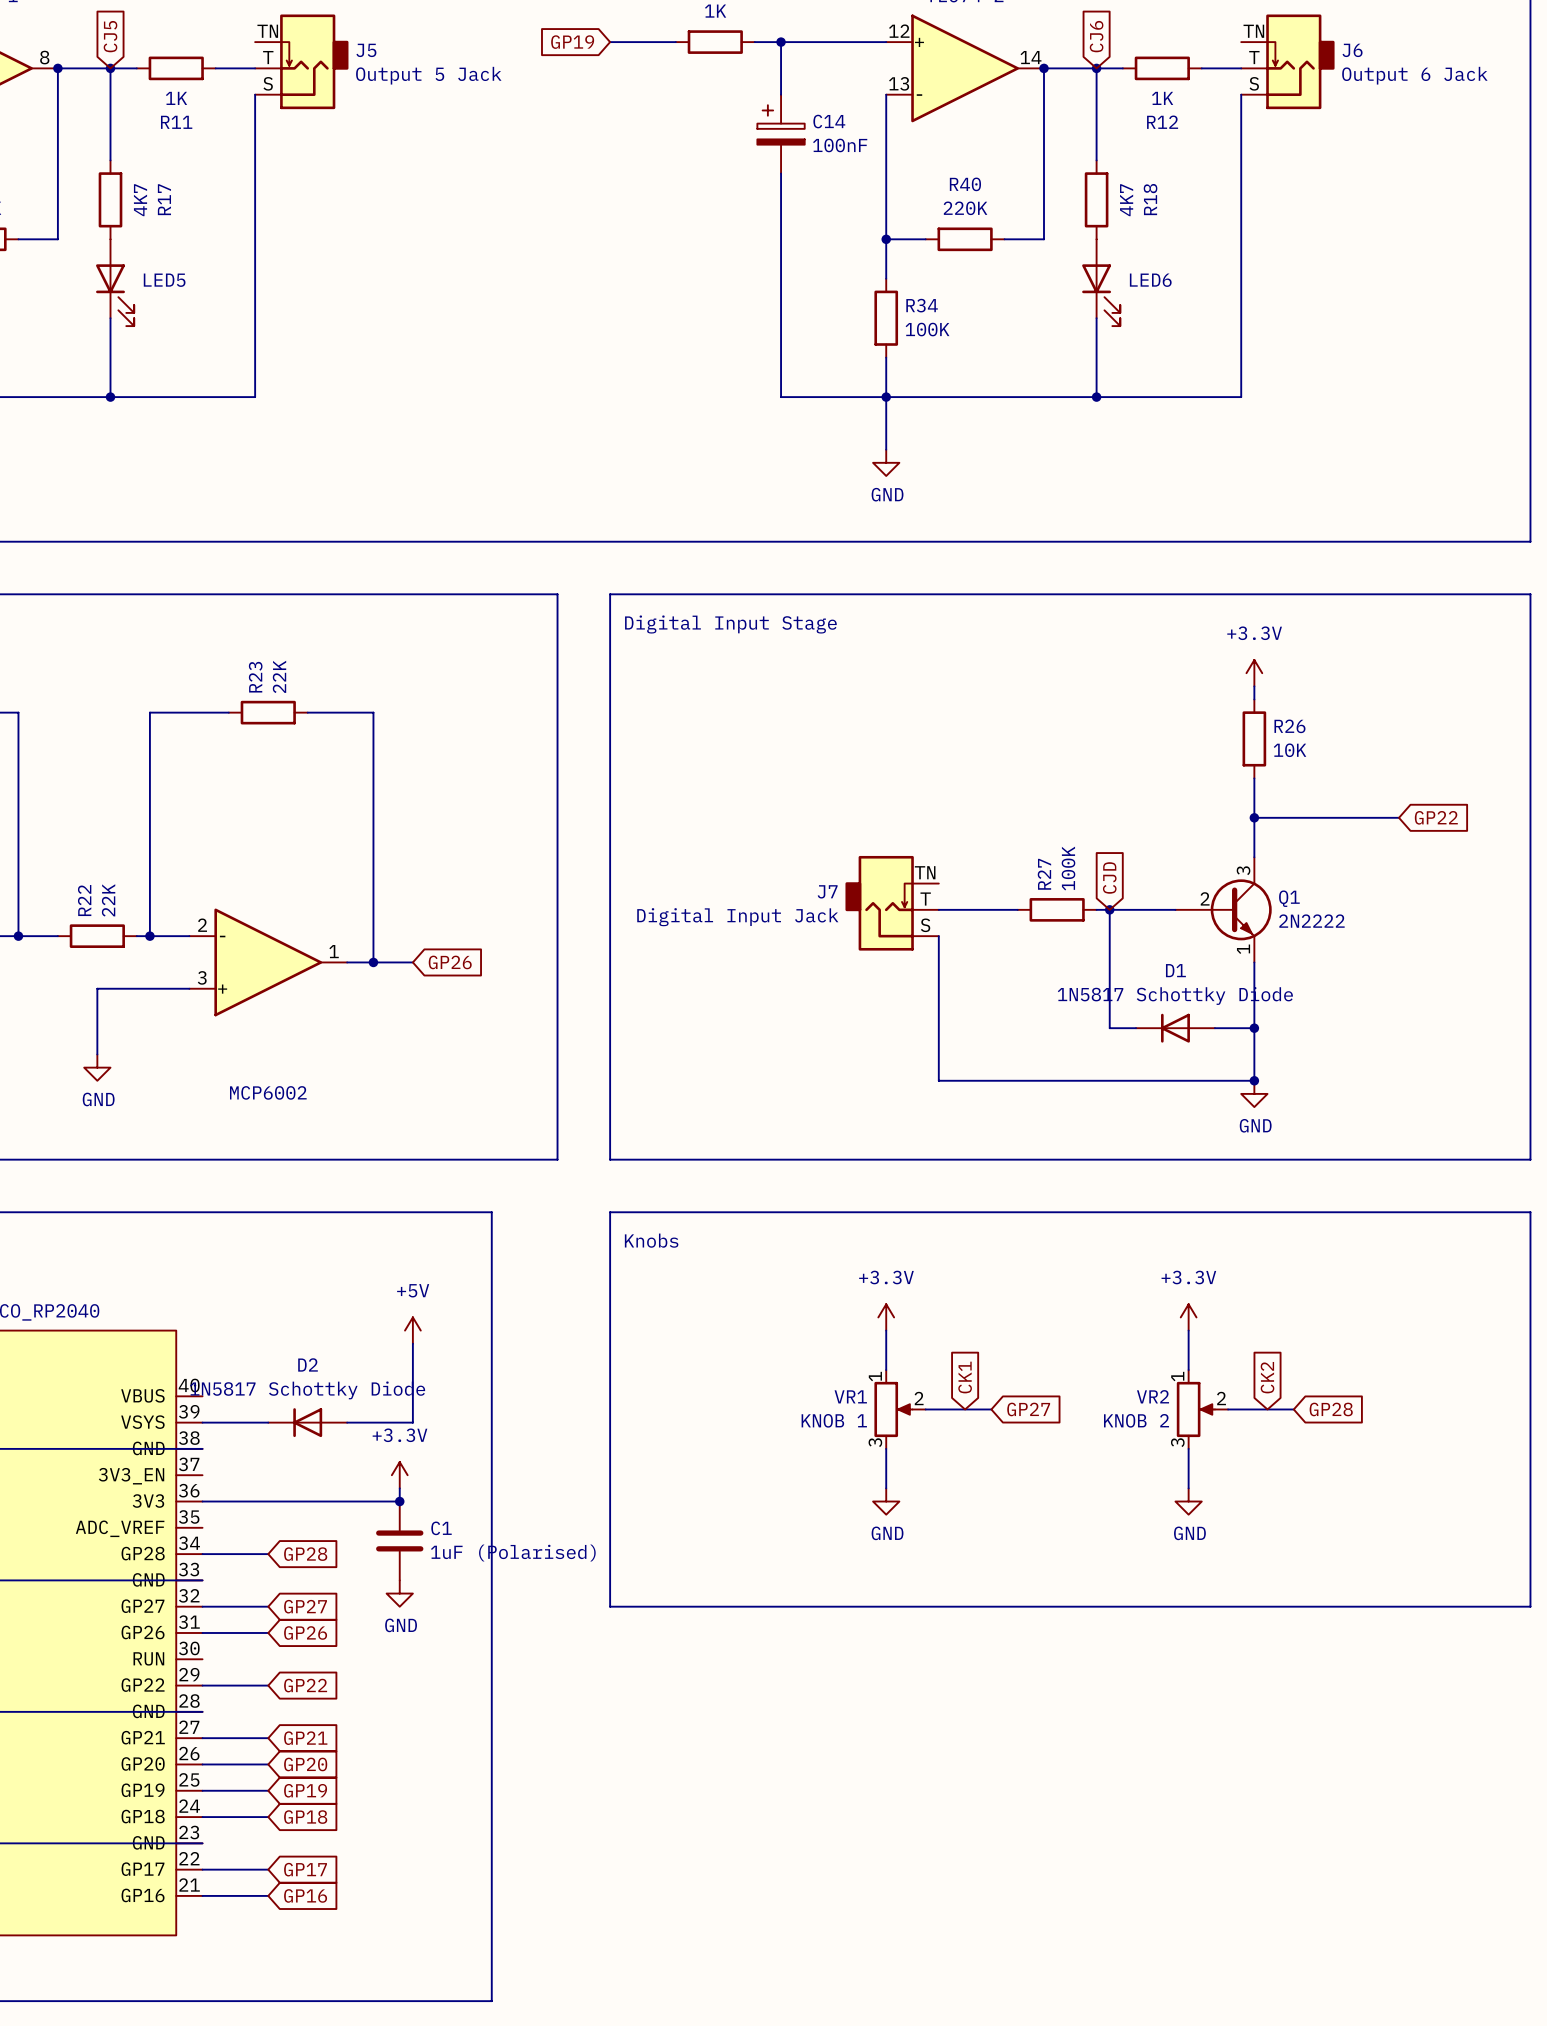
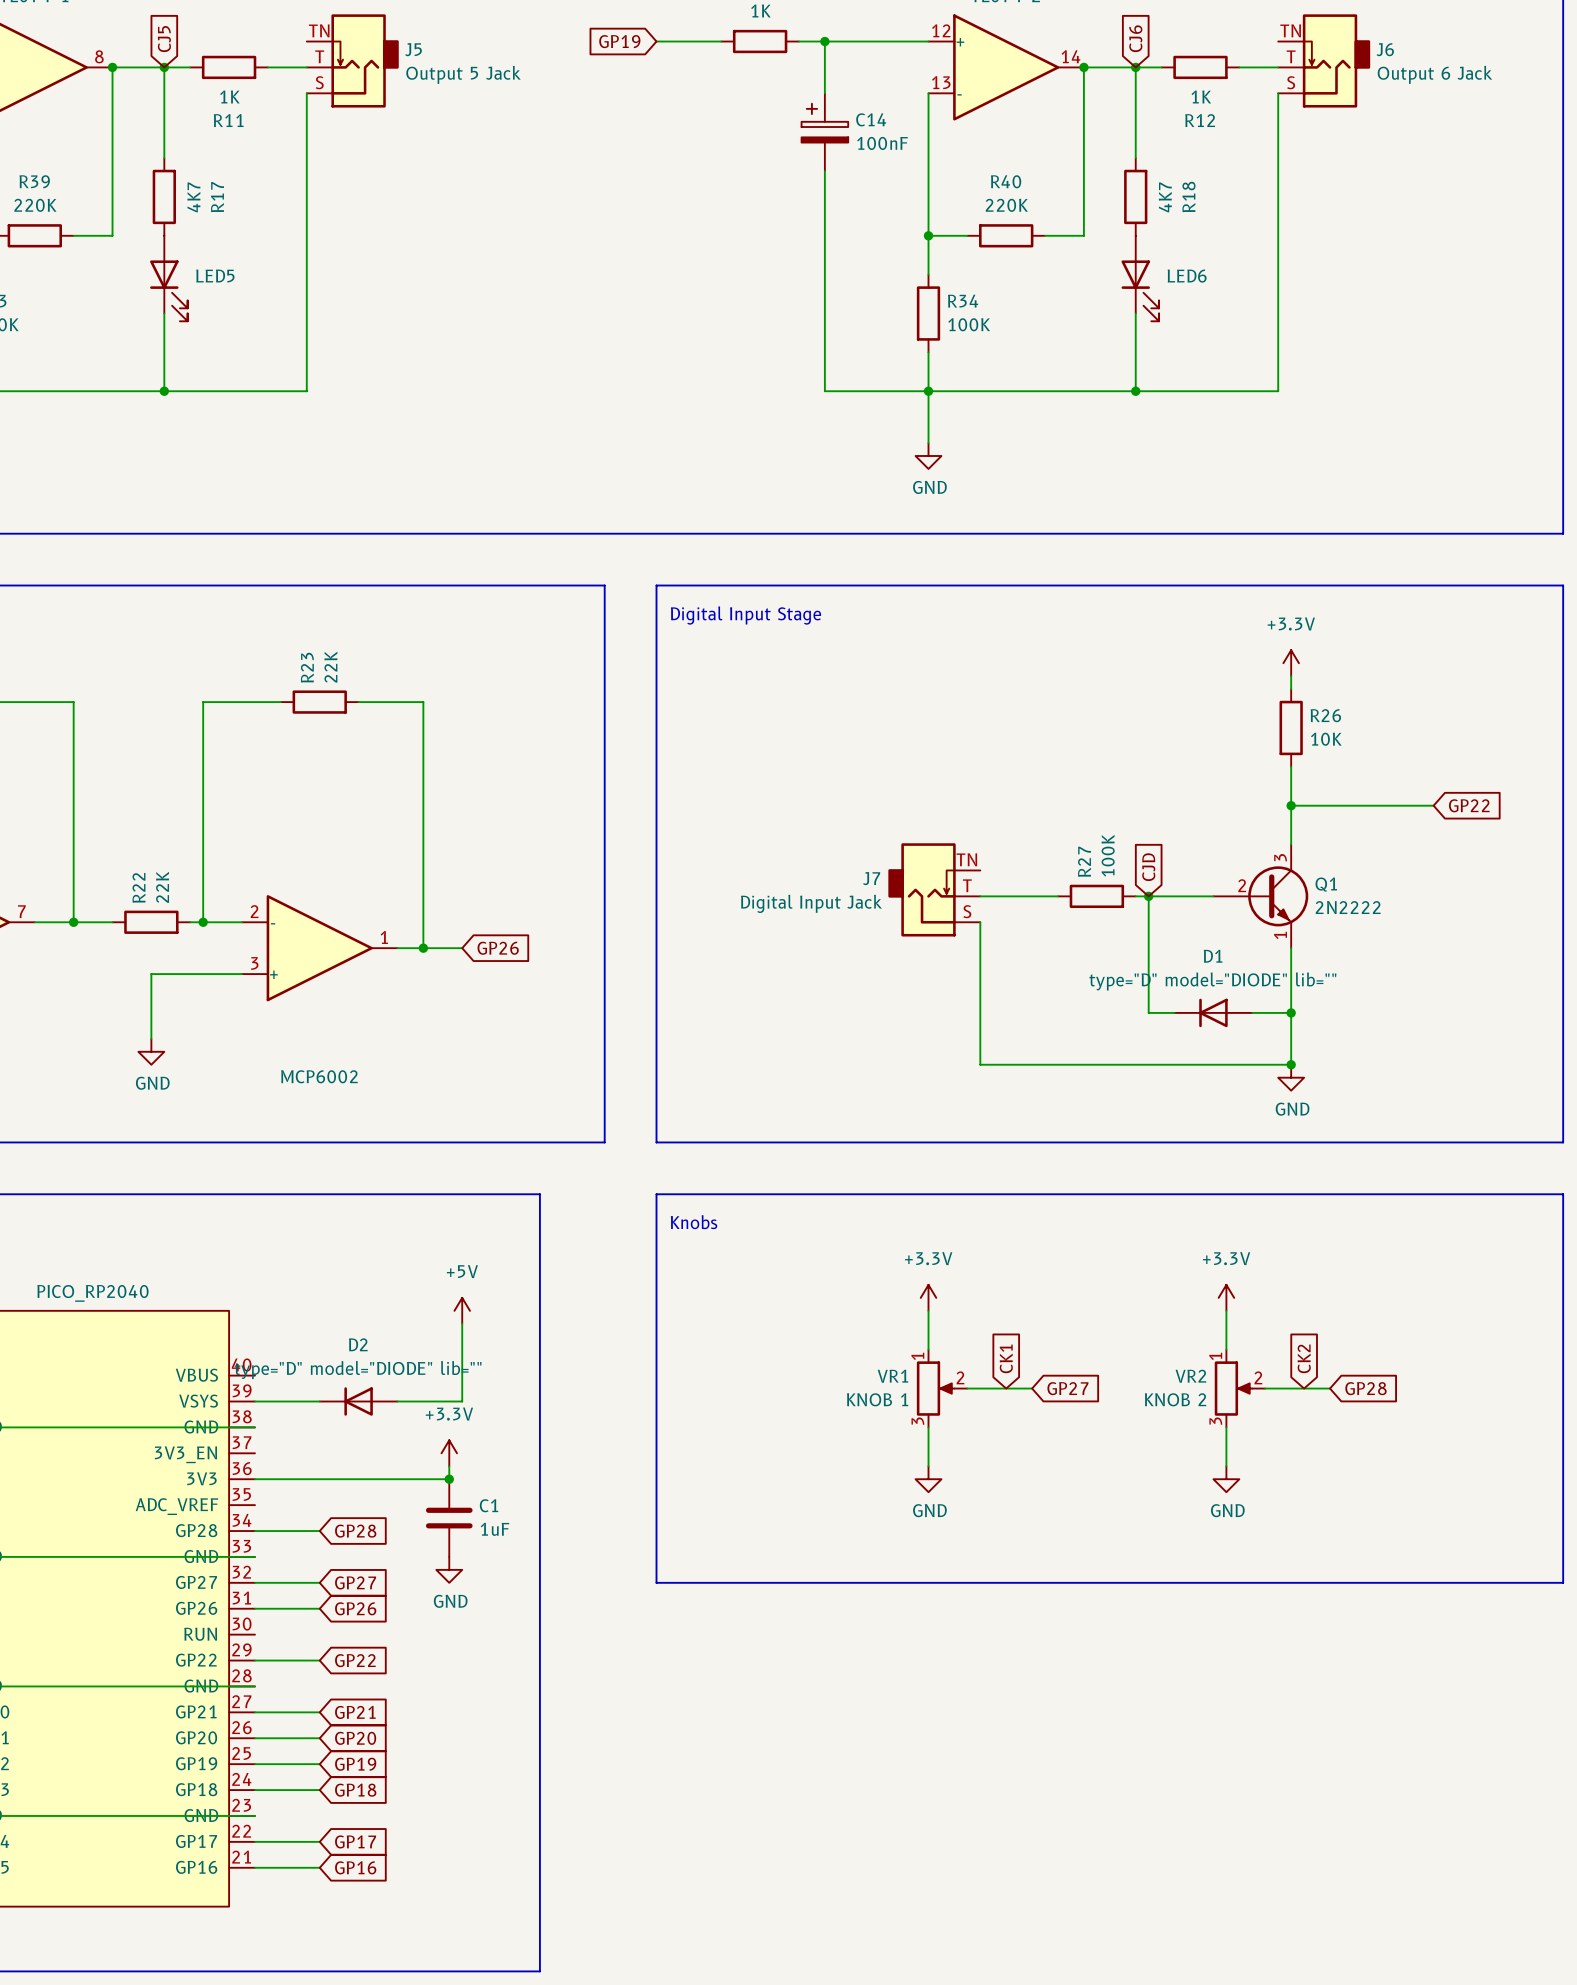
D1 value: 1N5817 Schottky Diode (1175, 995) -> type="D" model="DIODE" lib="" (1212, 981)
D2 value: 1N5817 Schottky Diode (307, 1390) -> type="D" model="DIODE" lib="" (358, 1370)
C1 value: 1uF (Polarised) (513, 1553) -> 1uF (495, 1529)

